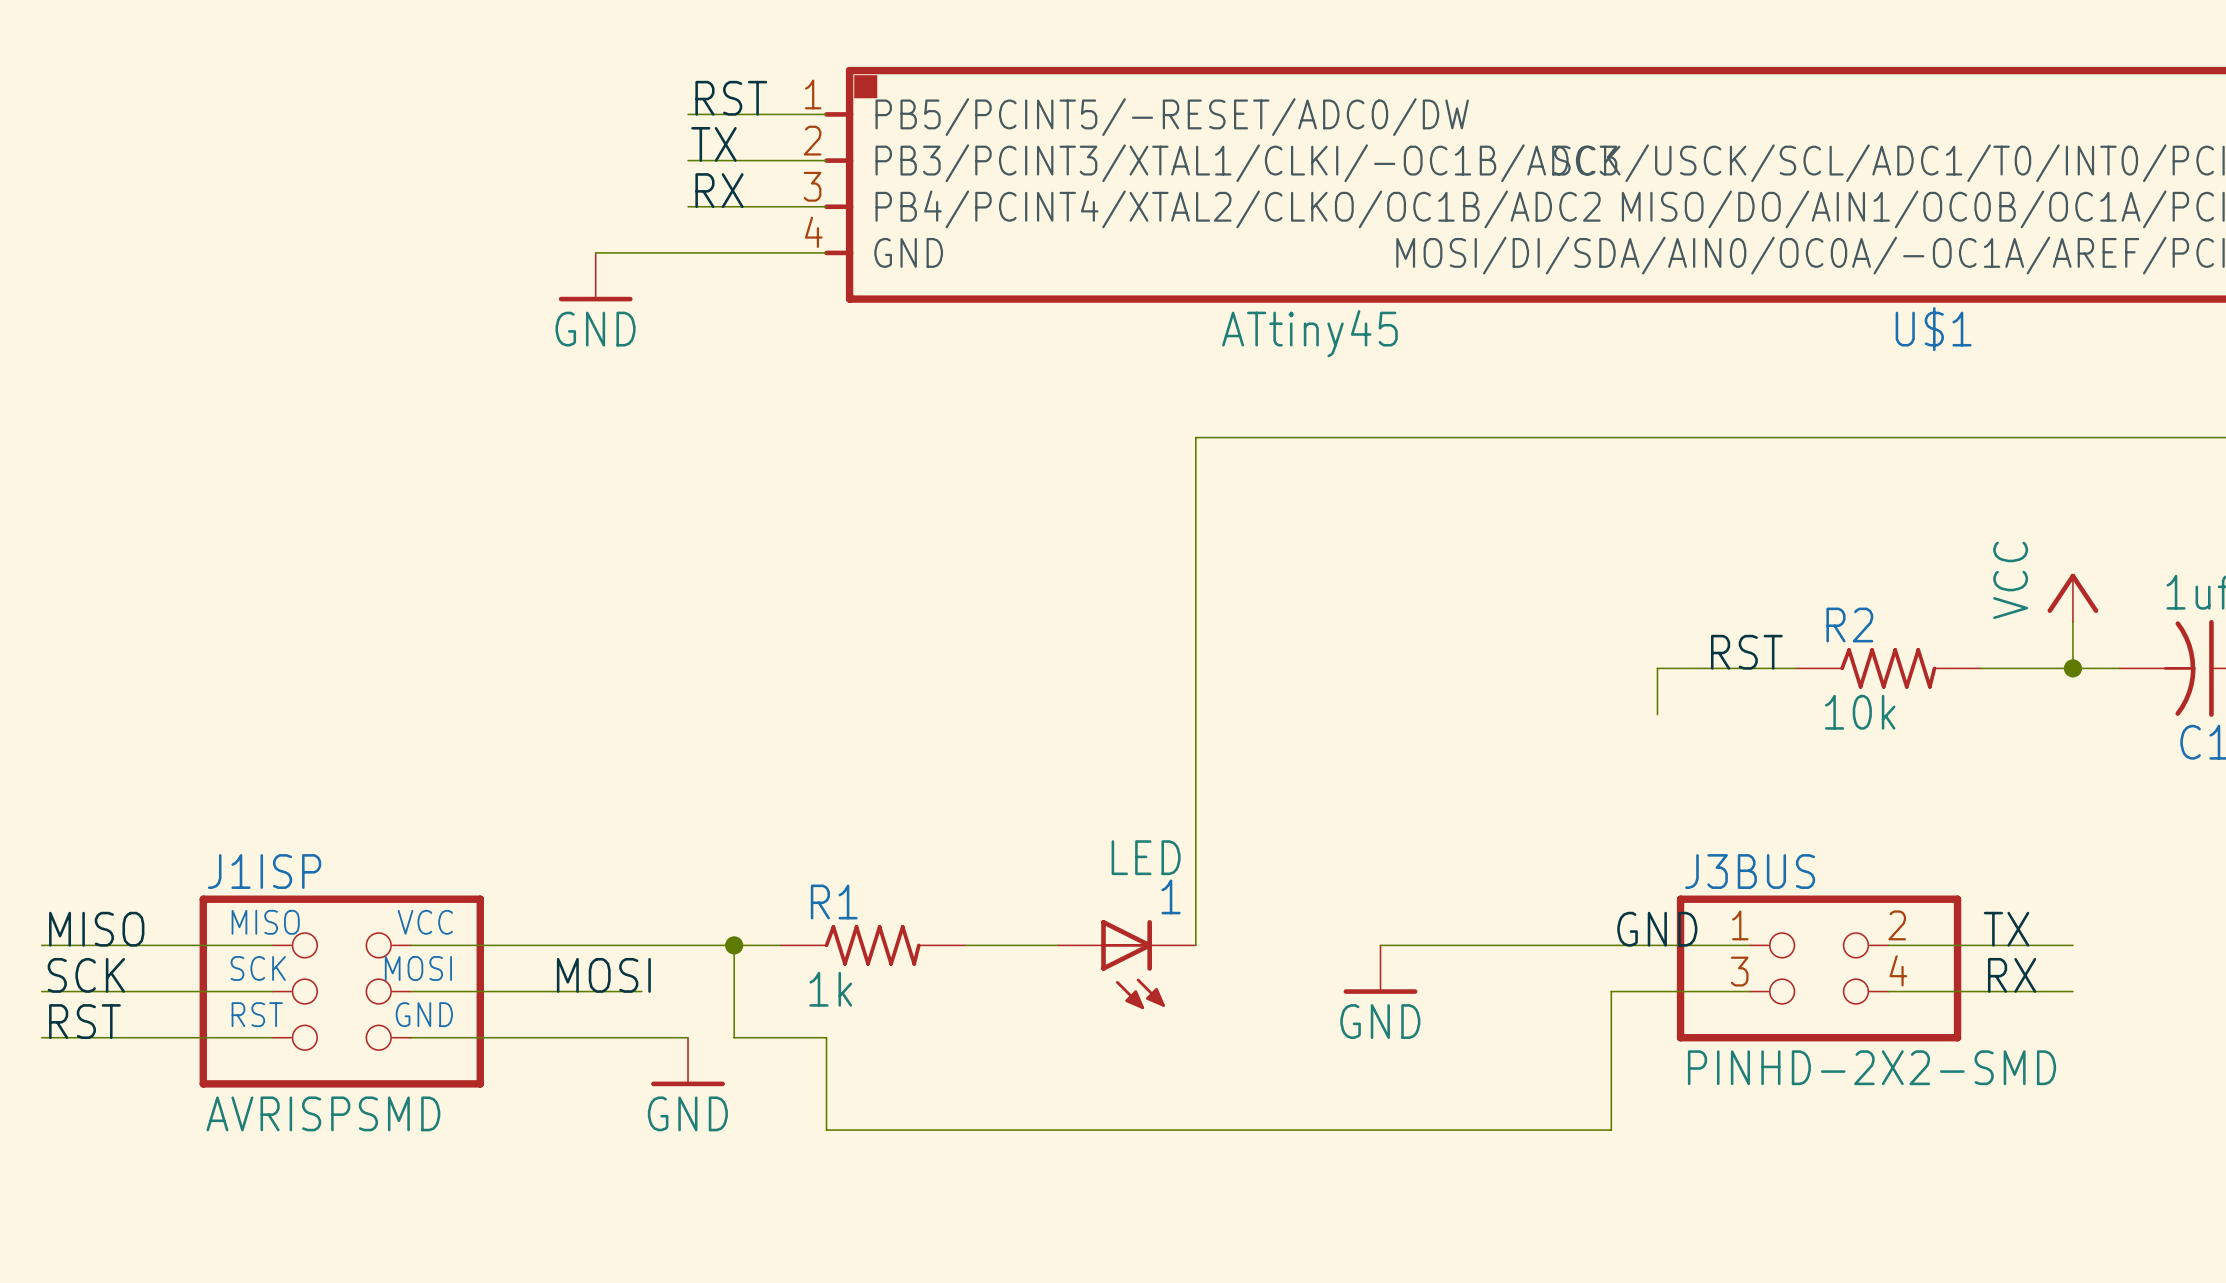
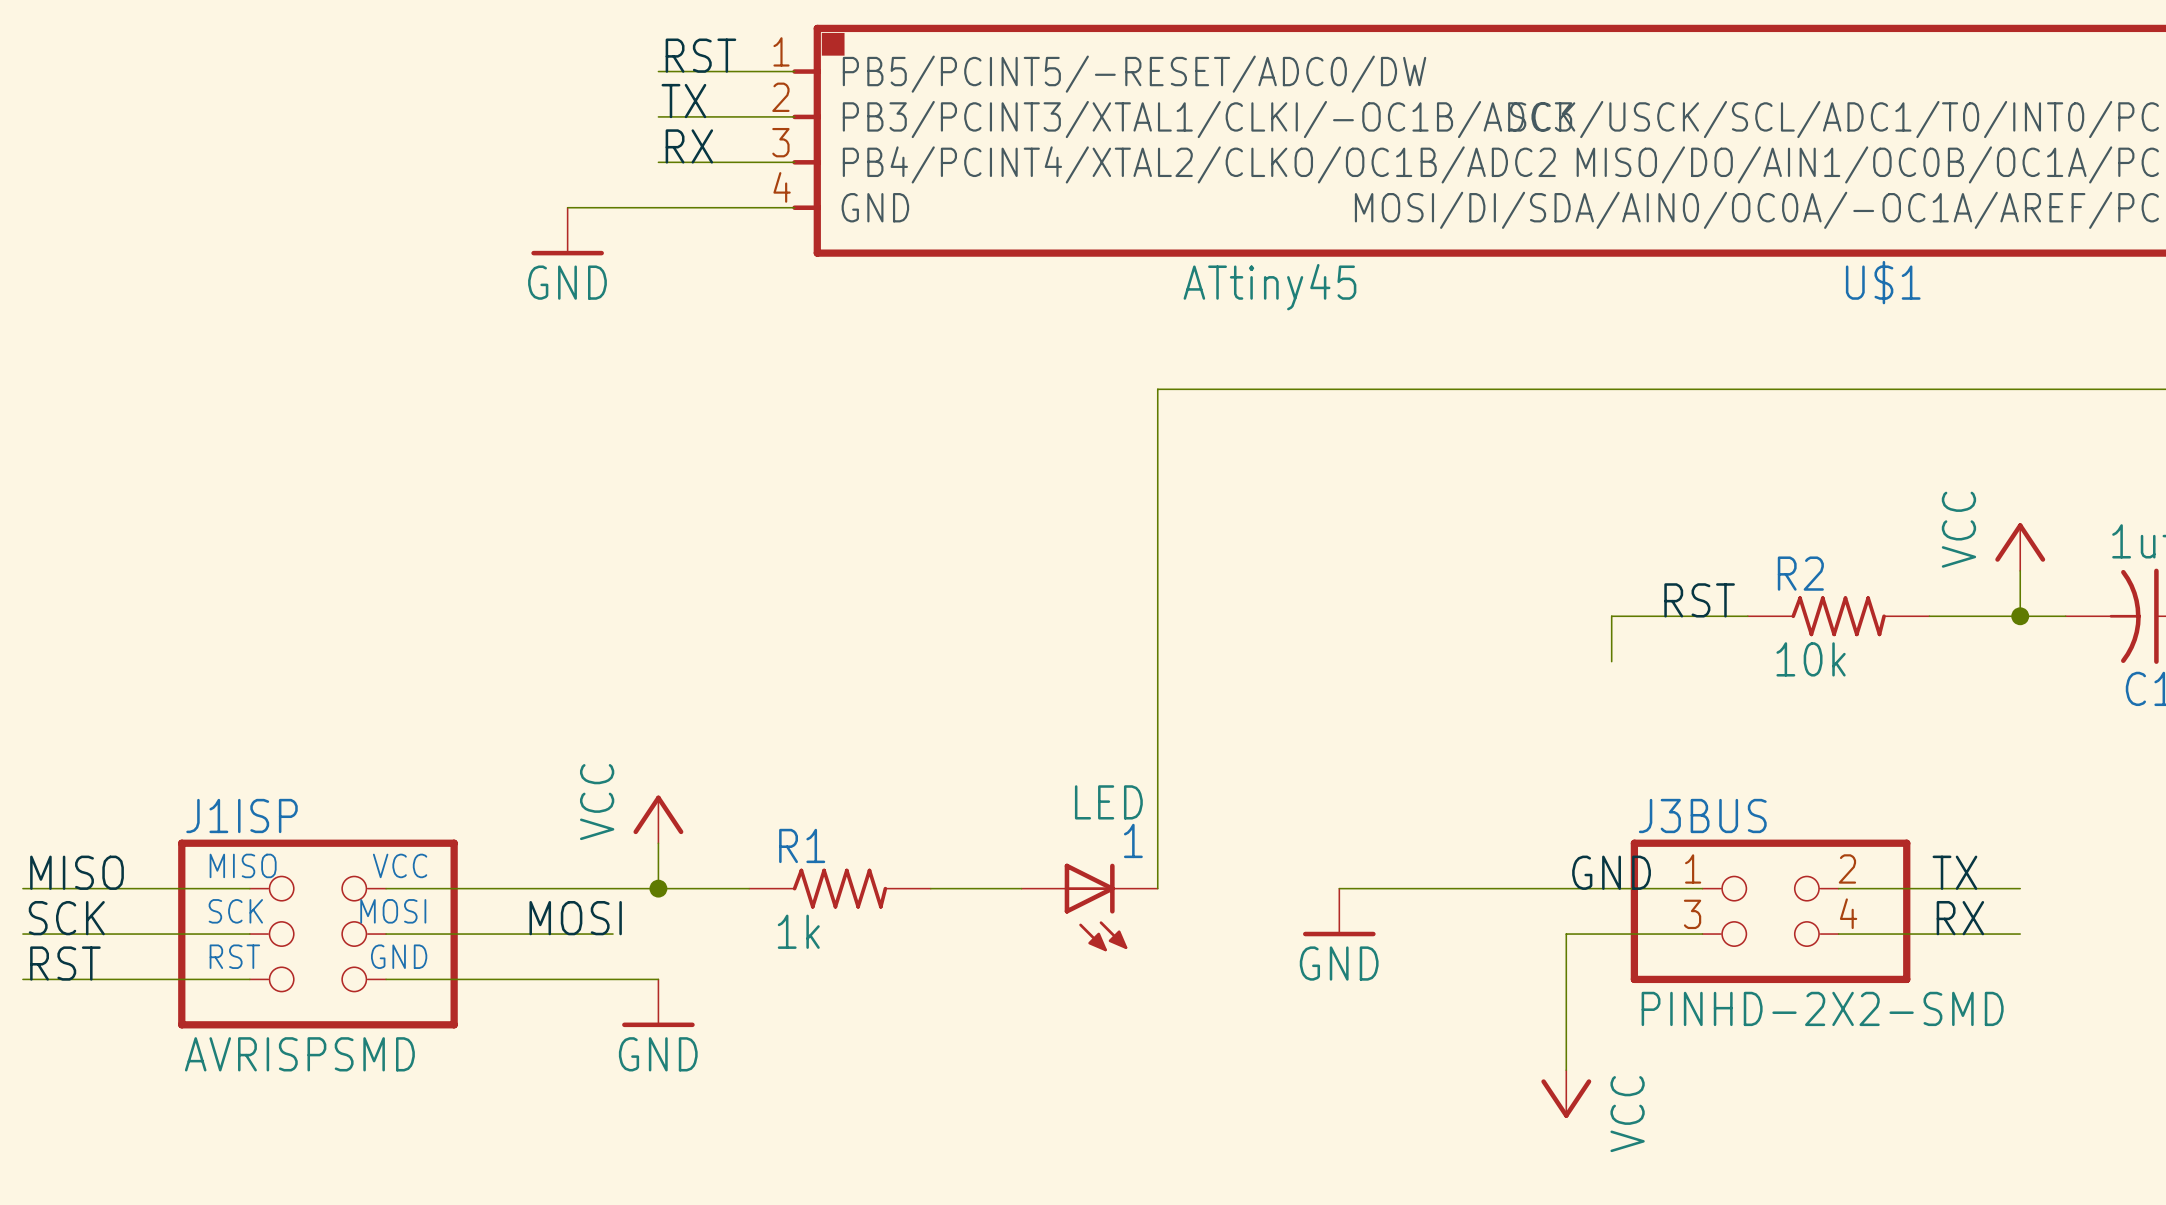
power symbol: none -> VCC (658, 819)
wire: none -> (658, 843) (658, 888)
wire: (734, 945) (734, 1037) (826, 1037) (826, 1130) (1611, 1130) -> none
junction position: (734, 945) -> (658, 888)
power symbol: none -> VCC (1566, 1094)

